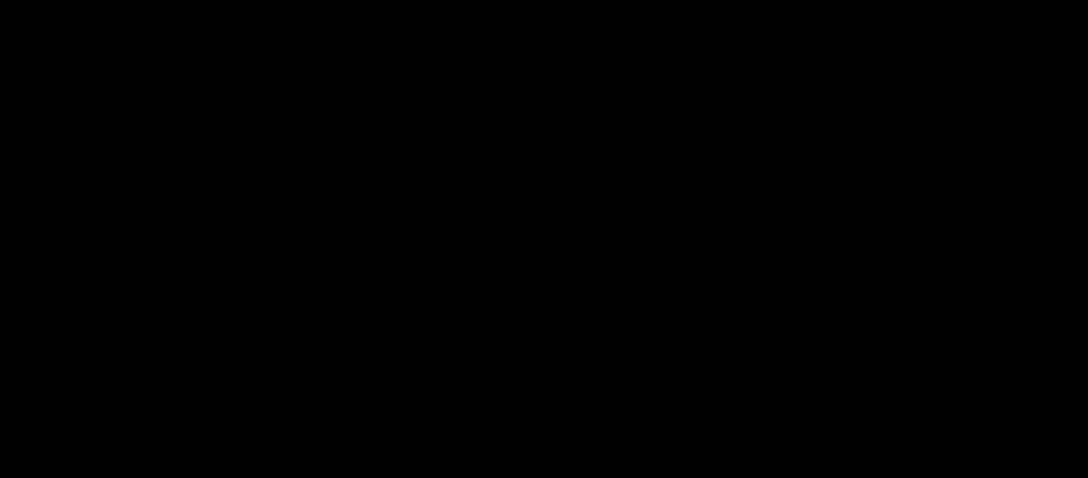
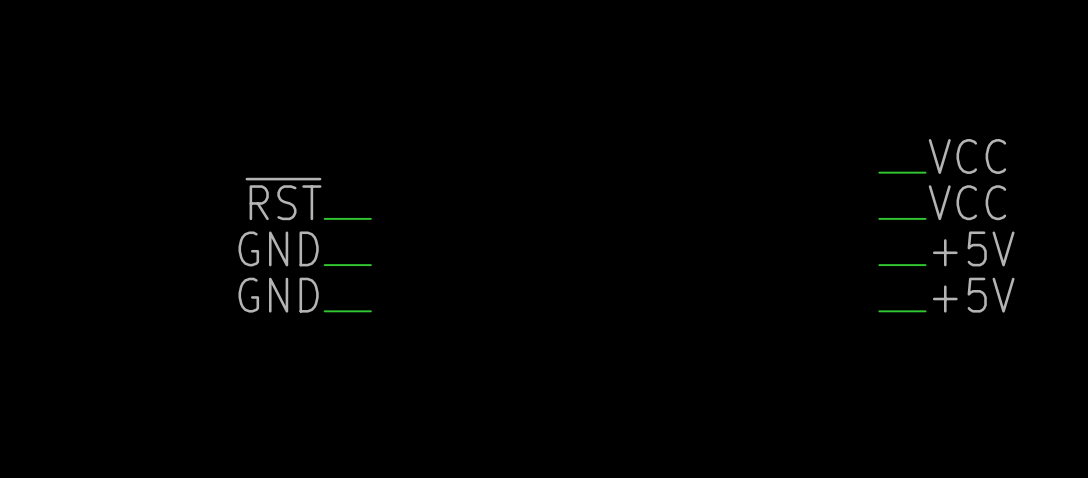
label: none -> VCC (967, 156)
wire: none -> (879, 172) (925, 172)
label: none -> ~{RST} (283, 198)
label: none -> VCC (967, 202)
wire: none -> (324, 218) (370, 218)
wire: none -> (879, 218) (925, 218)
label: none -> GND (278, 248)
label: none -> +5V (973, 248)
wire: none -> (324, 265) (370, 265)
wire: none -> (879, 265) (925, 265)
label: none -> GND (278, 295)
label: none -> +5V (973, 295)
wire: none -> (324, 311) (370, 311)
wire: none -> (879, 311) (925, 311)

